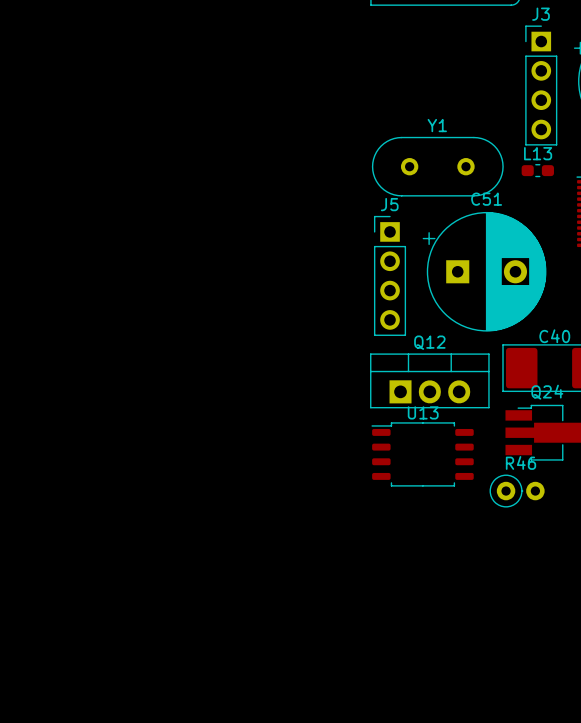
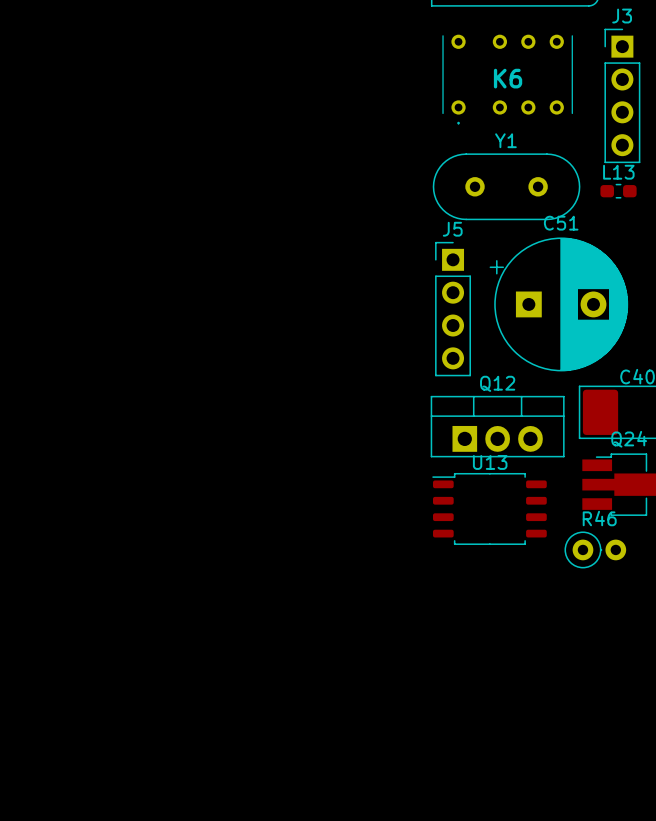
K6: none -> (507, 79)

